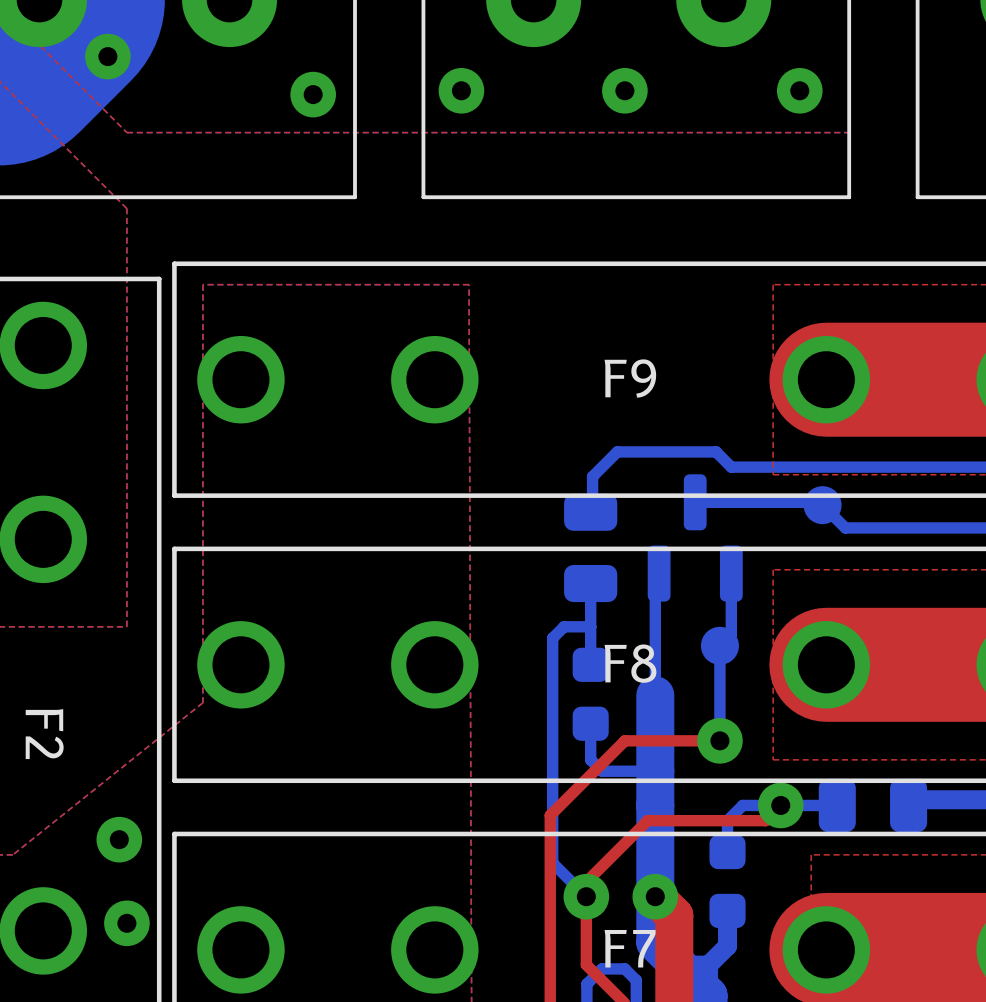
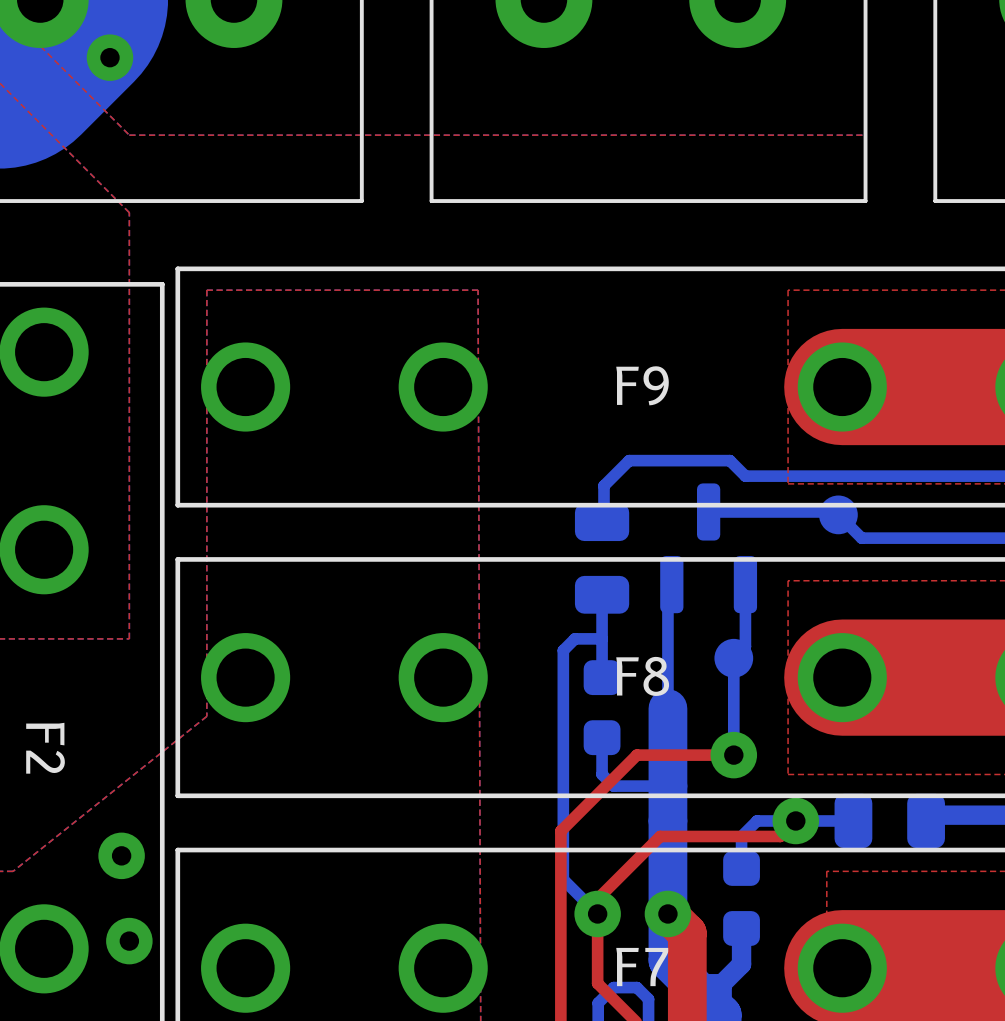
via: (461, 90) -> none
via: (624, 90) -> none
via: (799, 90) -> none
via: (313, 94) -> none

